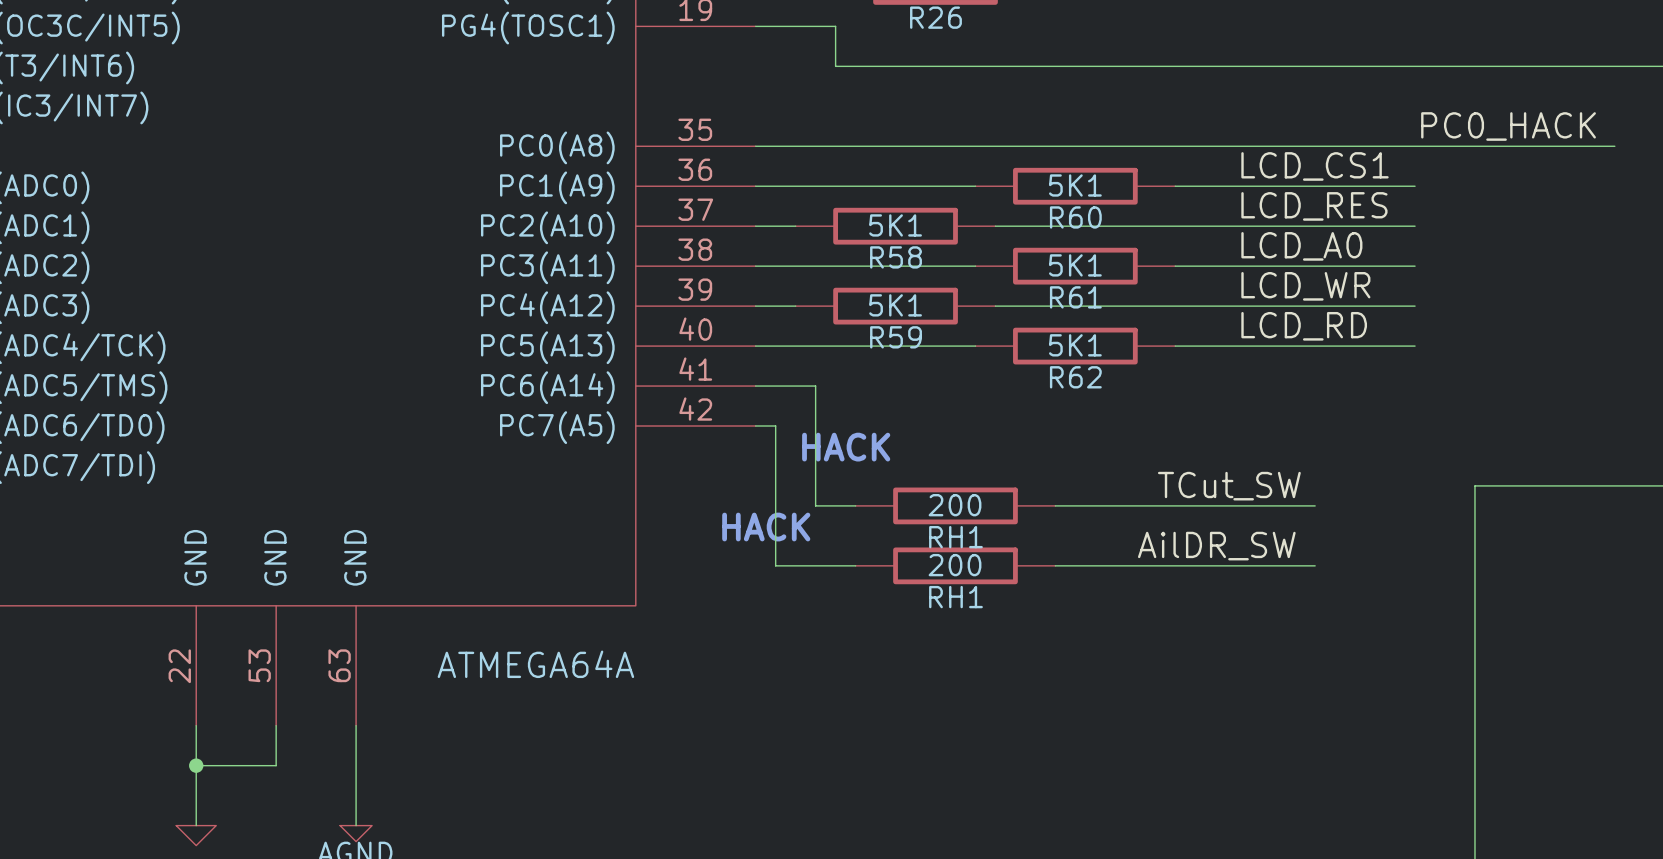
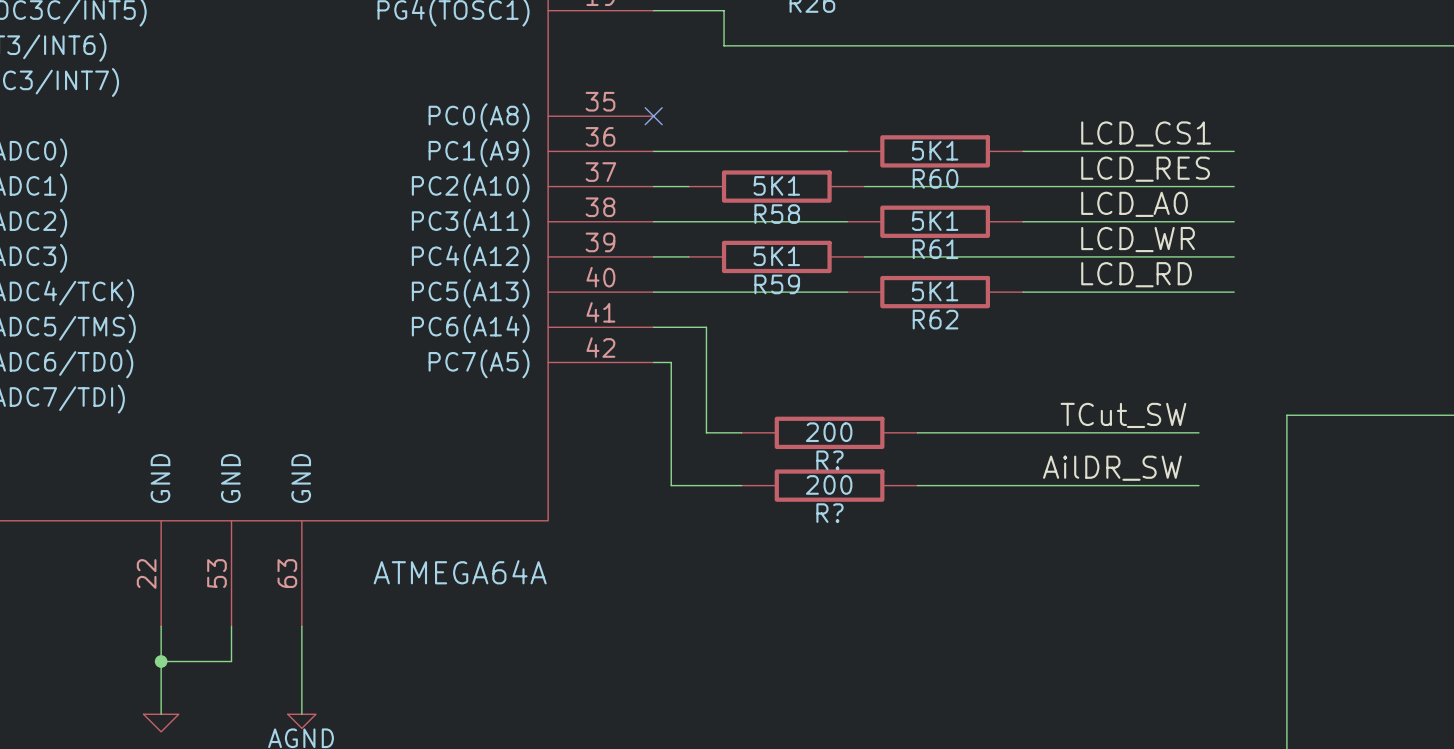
label: PC0_HACK (1508, 126) -> none
wire: (755, 146) (1614, 146) -> none
no-connect mark: none -> (653, 116)
text: HACK (846, 447) -> none
label position: TCut_SW (1229, 486) -> TCut_SW (1123, 415)
wire: none -> (1146, 432) (1198, 432)
text: HACK (766, 527) -> none
RH1 name: RH1 (955, 537) -> R? (829, 460)
label position: AilDR_SW (1216, 546) -> AilDR_SW (1112, 468)
wire: none -> (1146, 485) (1198, 485)
RH1 name: RH1 (955, 597) -> R? (829, 513)

